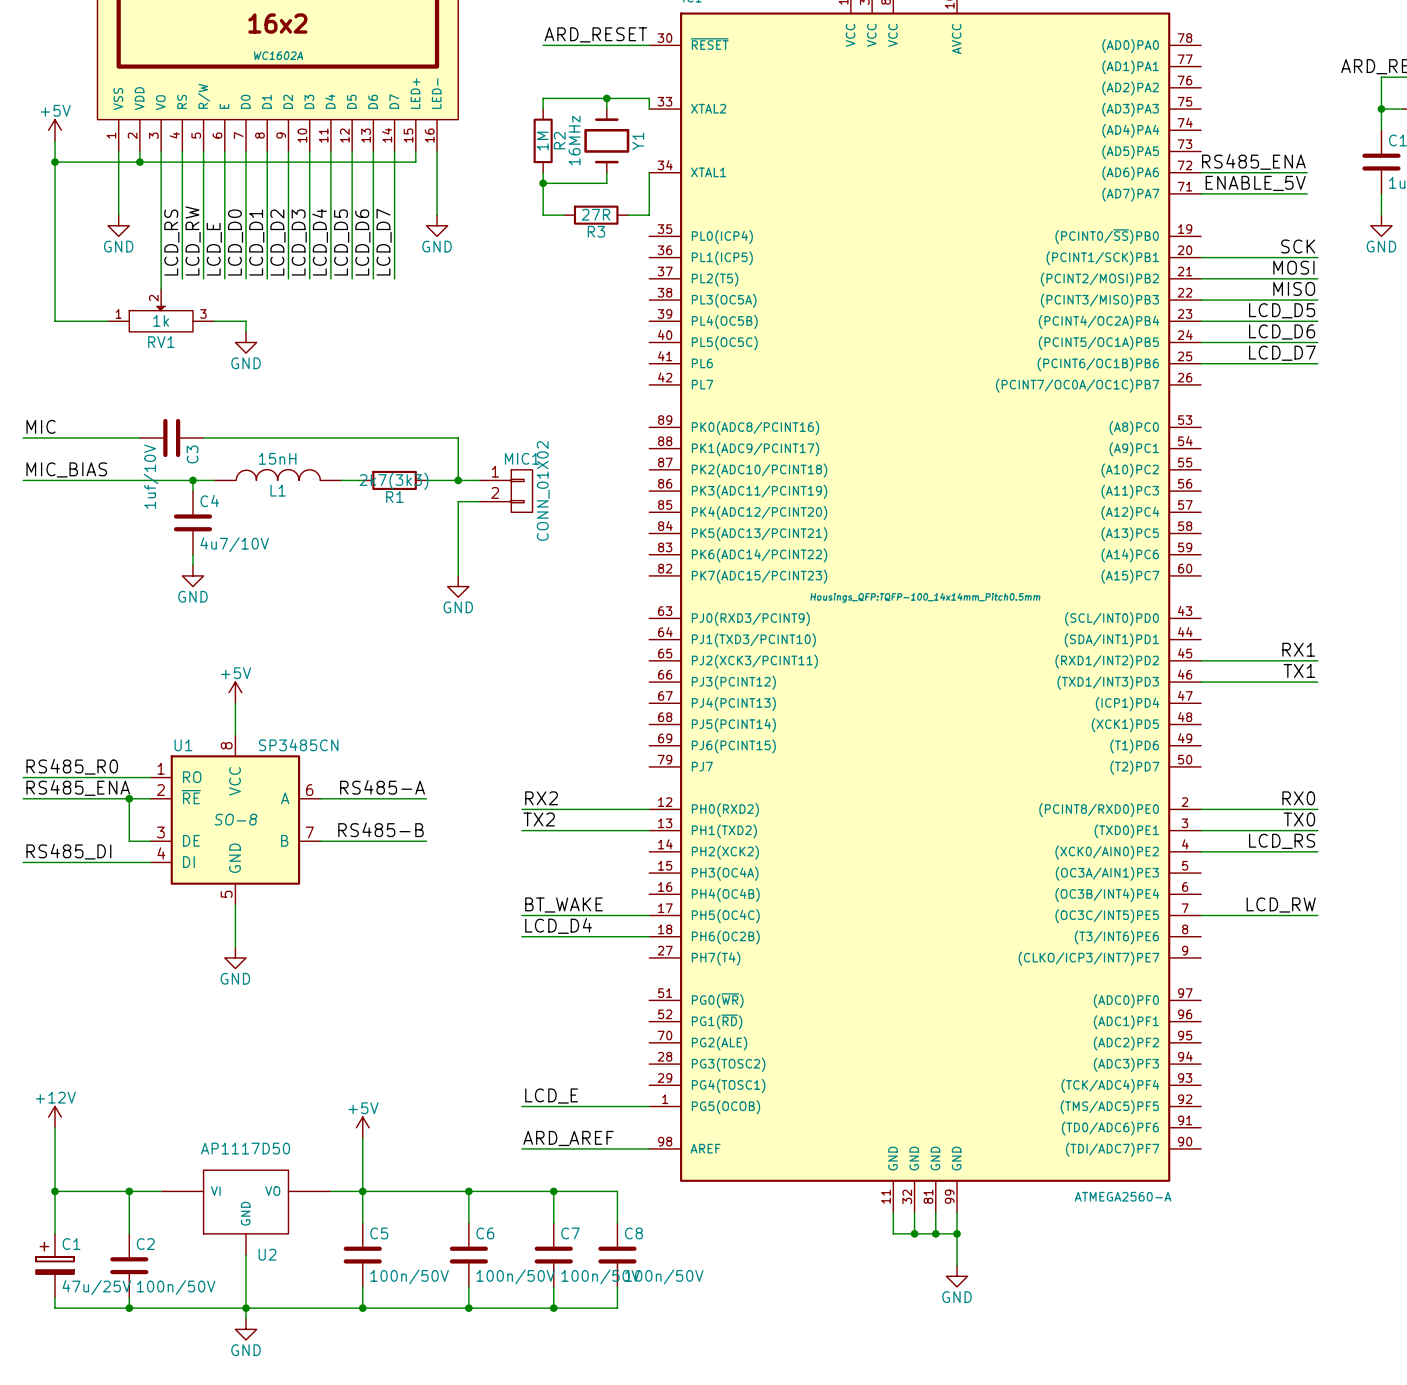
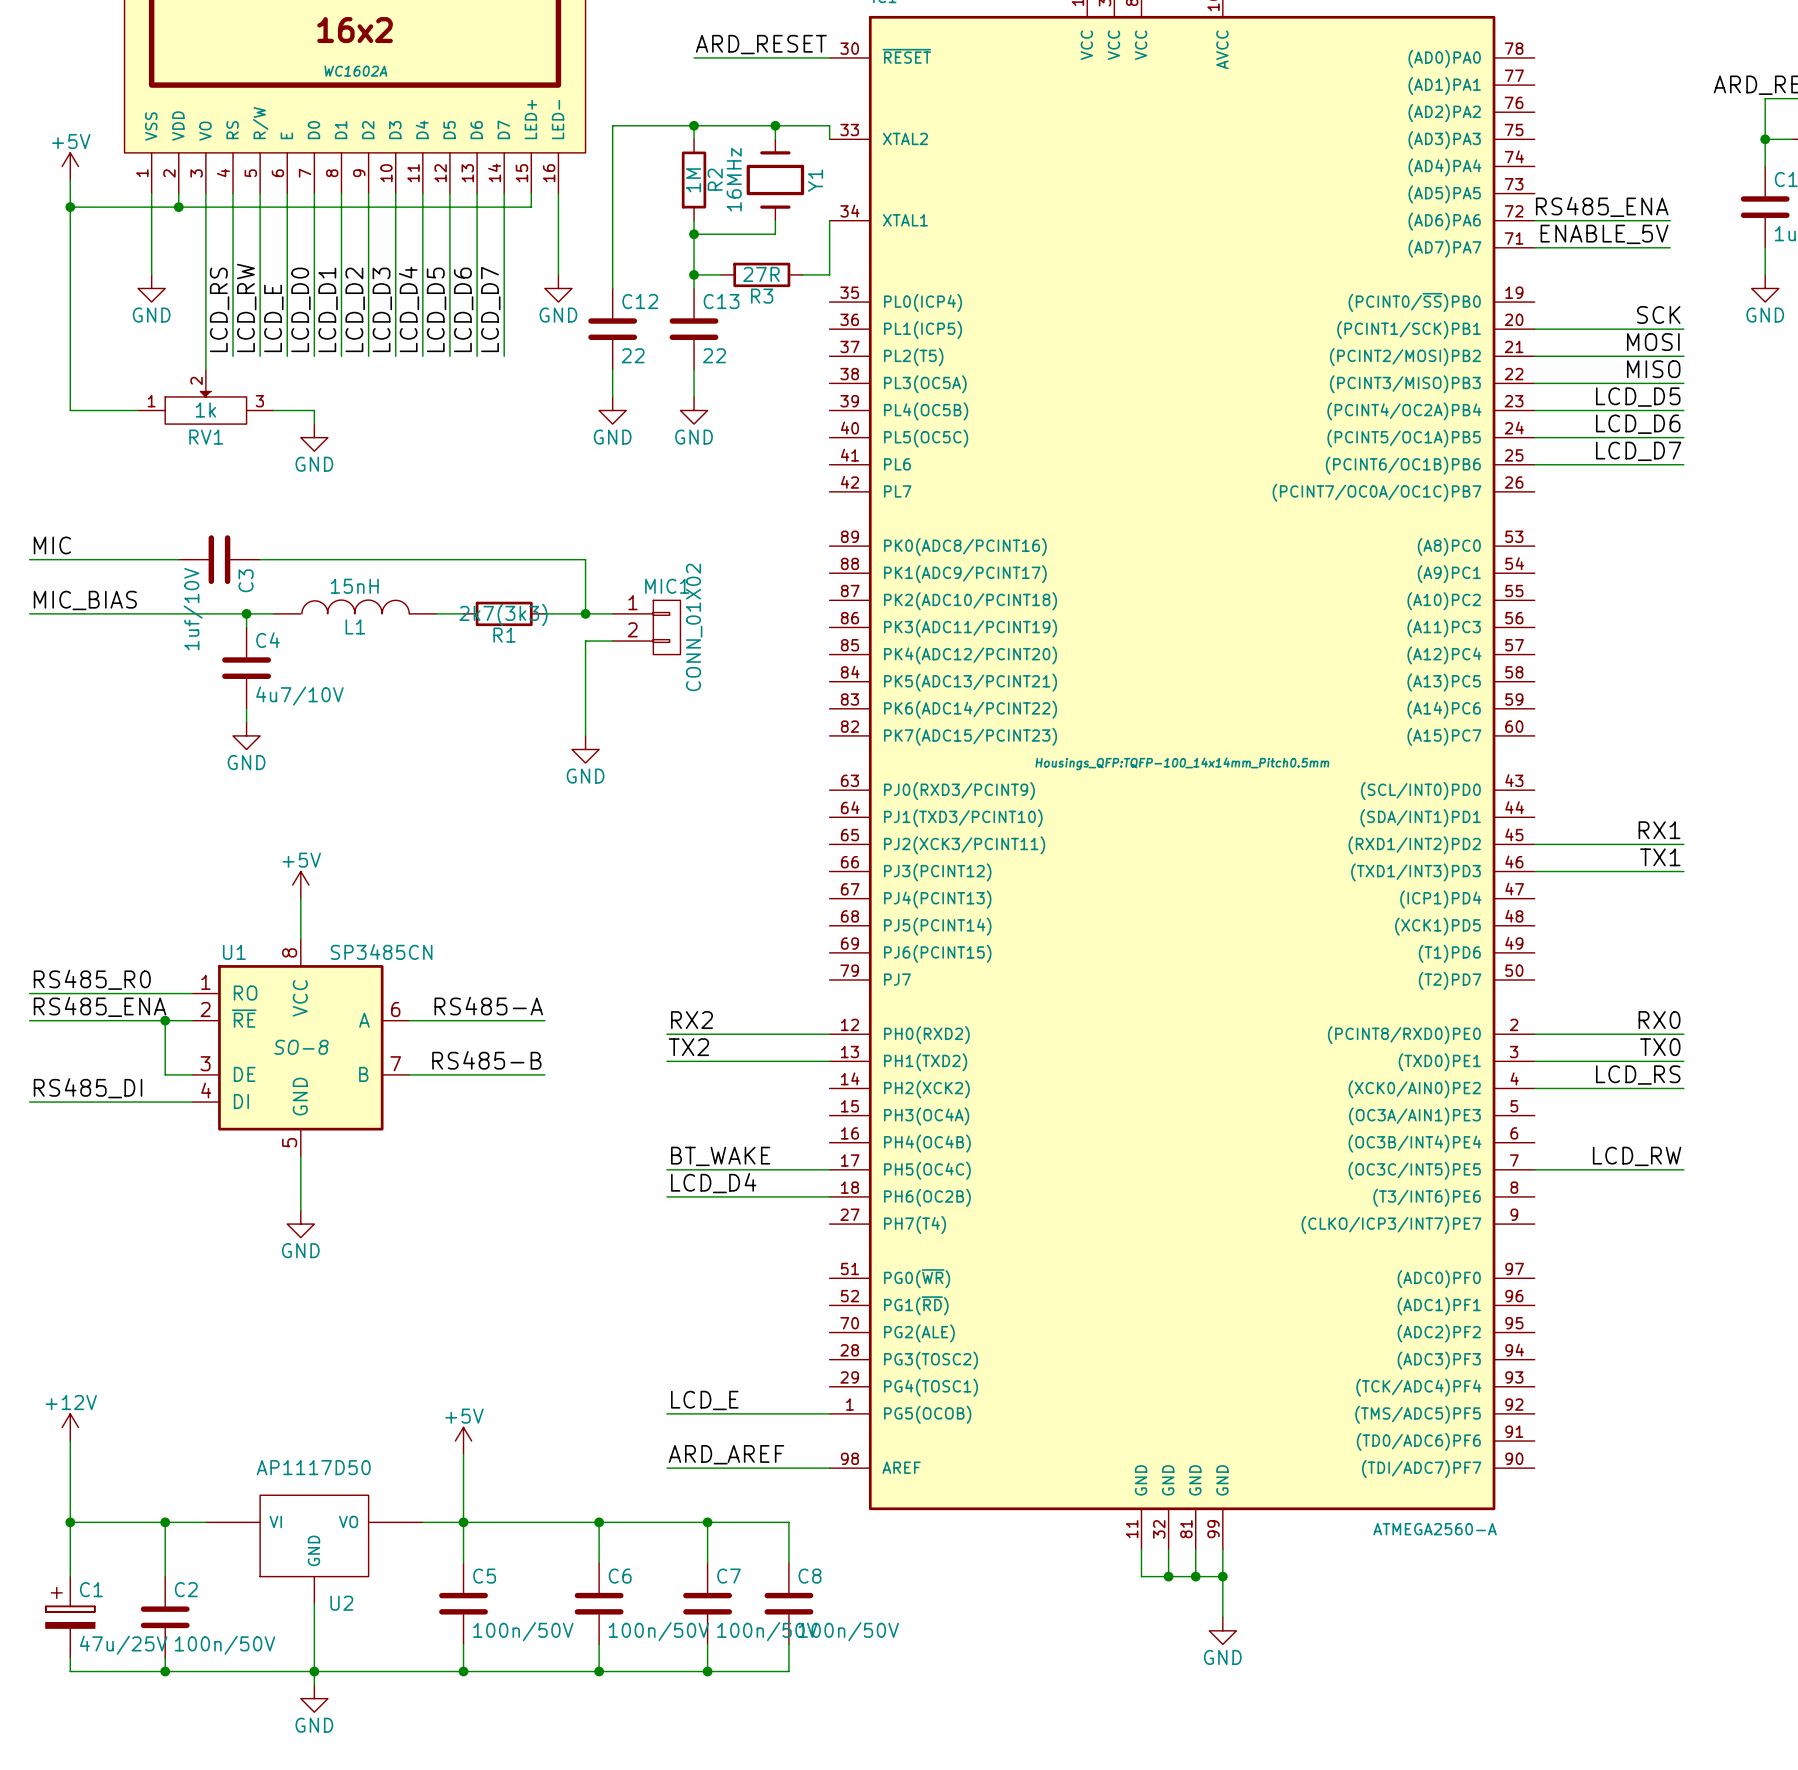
wire: none -> (694, 125) (612, 125) (612, 288)
junction: none -> (694, 125)
wire: none -> (694, 274) (694, 288)
junction: none -> (694, 274)
C12: none -> 22 (612, 329)
C13: none -> 22 (694, 329)
wire: none -> (612, 369) (612, 396)
wire: none -> (694, 369) (694, 396)
power symbol: none -> GND (612, 410)
power symbol: none -> GND (694, 410)

